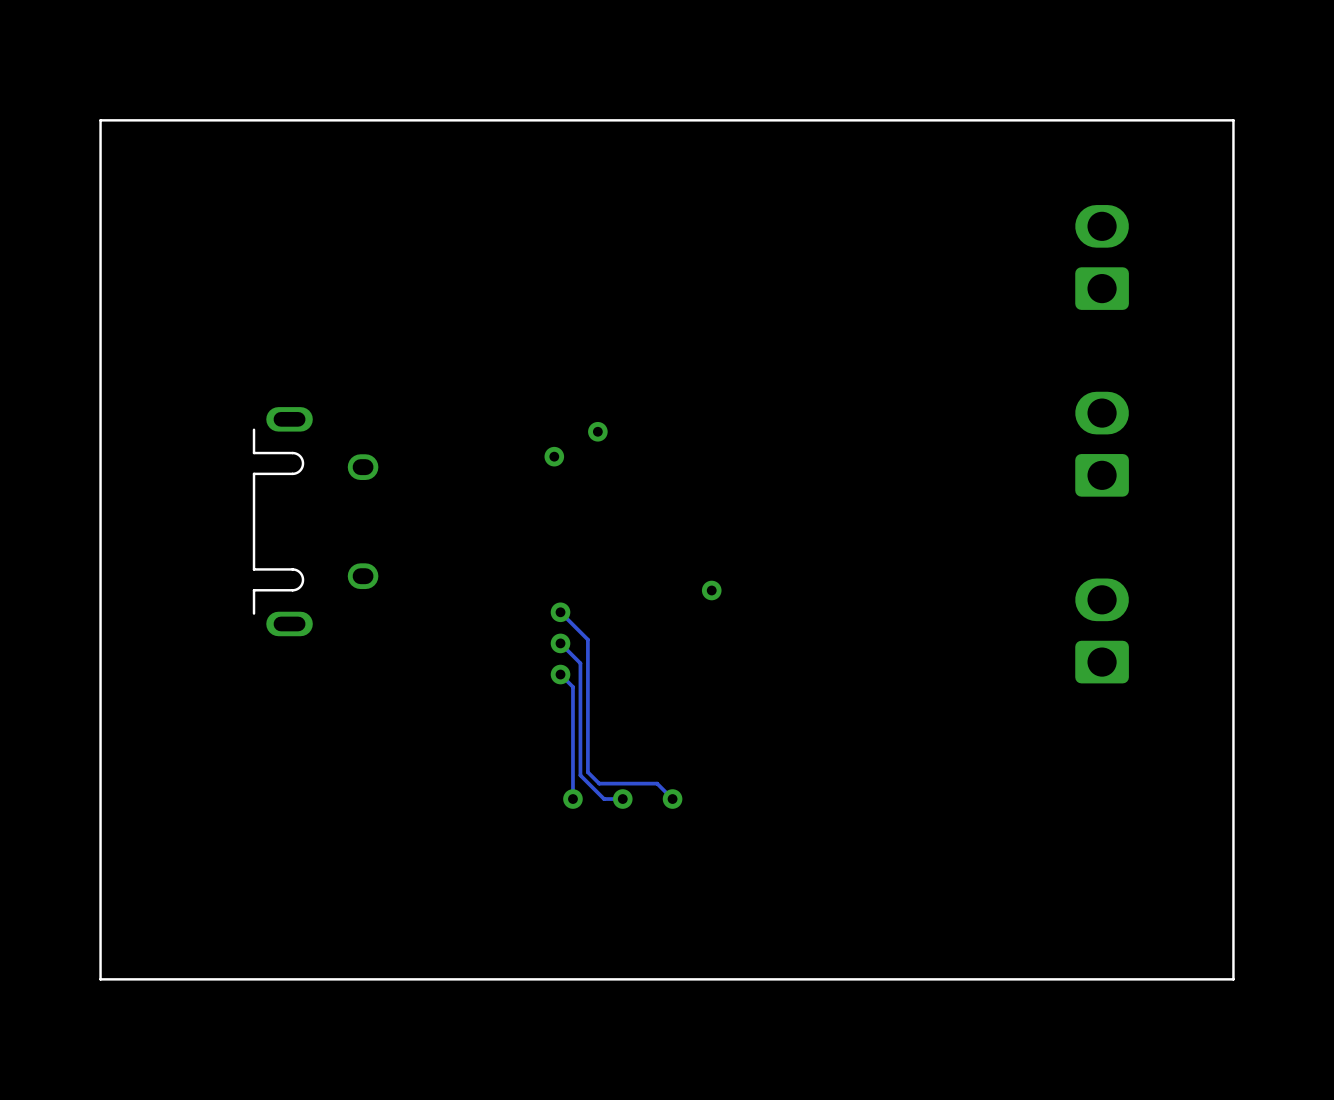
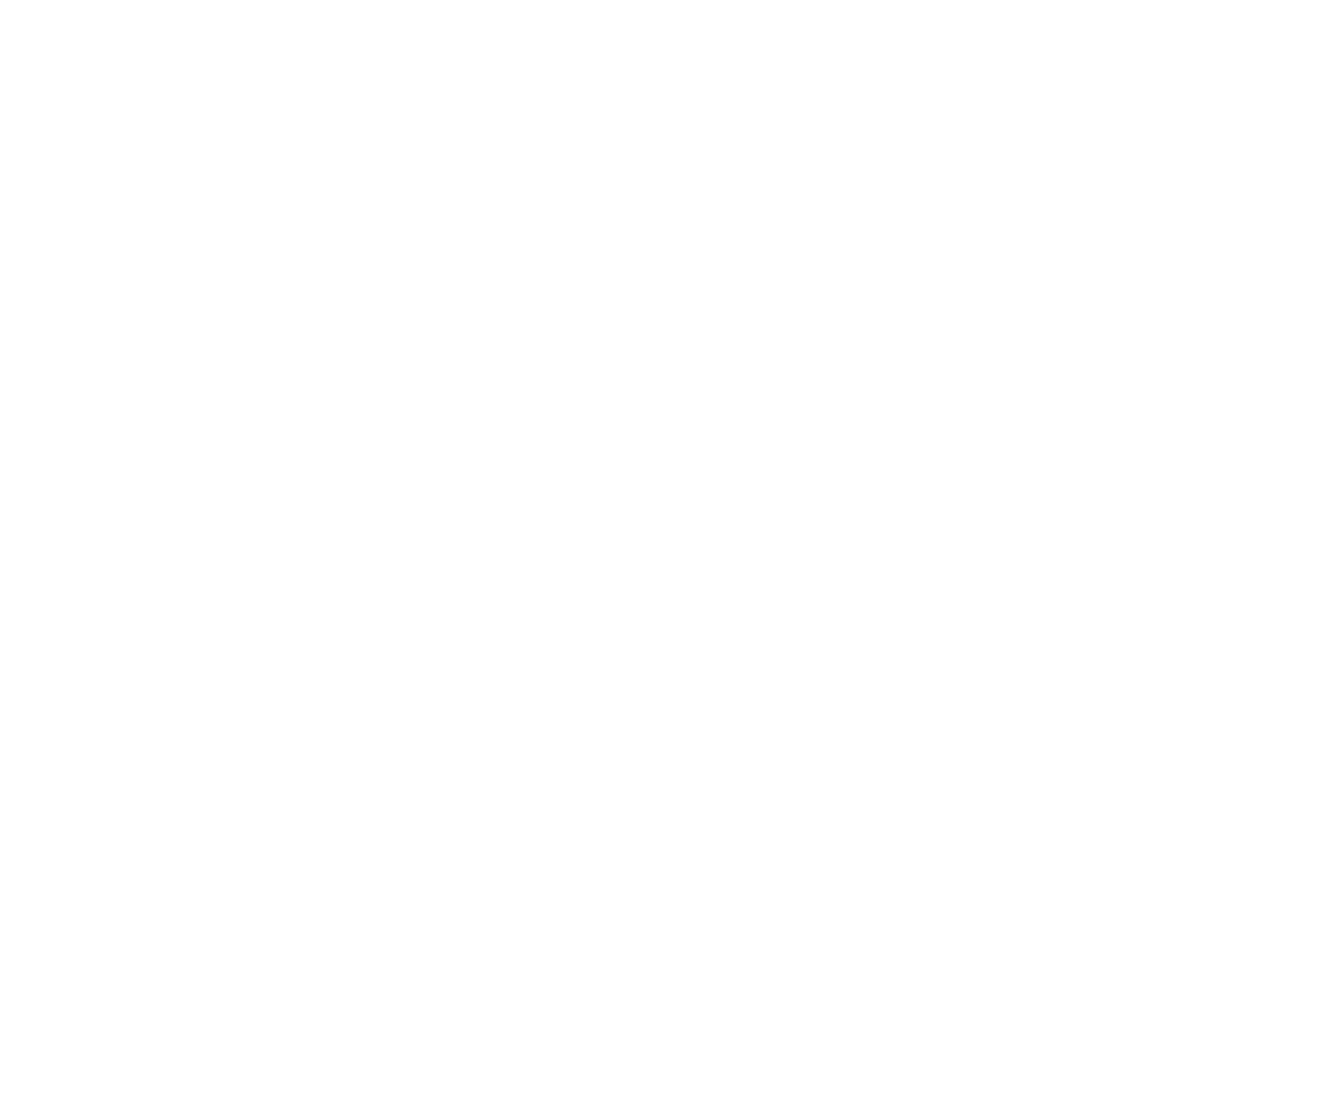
board edge: (1233, 120) (100, 120) (100, 979) (1233, 979) (1233, 120) -> none
part: (1102, 257) -> none
via: (597, 431) -> none
part: (1102, 444) -> none
via: (554, 456) -> none
part: (315, 521) -> none
via: (711, 590) -> none
track: (560, 612) (587, 639) (587, 772) (599, 783) (657, 783) (672, 799) -> none
via: (560, 612) -> none
part: (1102, 630) -> none
track: (560, 643) (580, 663) (580, 775) (604, 799) (622, 799) -> none
via: (560, 643) -> none
track: (560, 674) (572, 686) (572, 799) -> none
via: (560, 674) -> none
via: (572, 799) -> none
via: (622, 799) -> none
via: (672, 799) -> none

